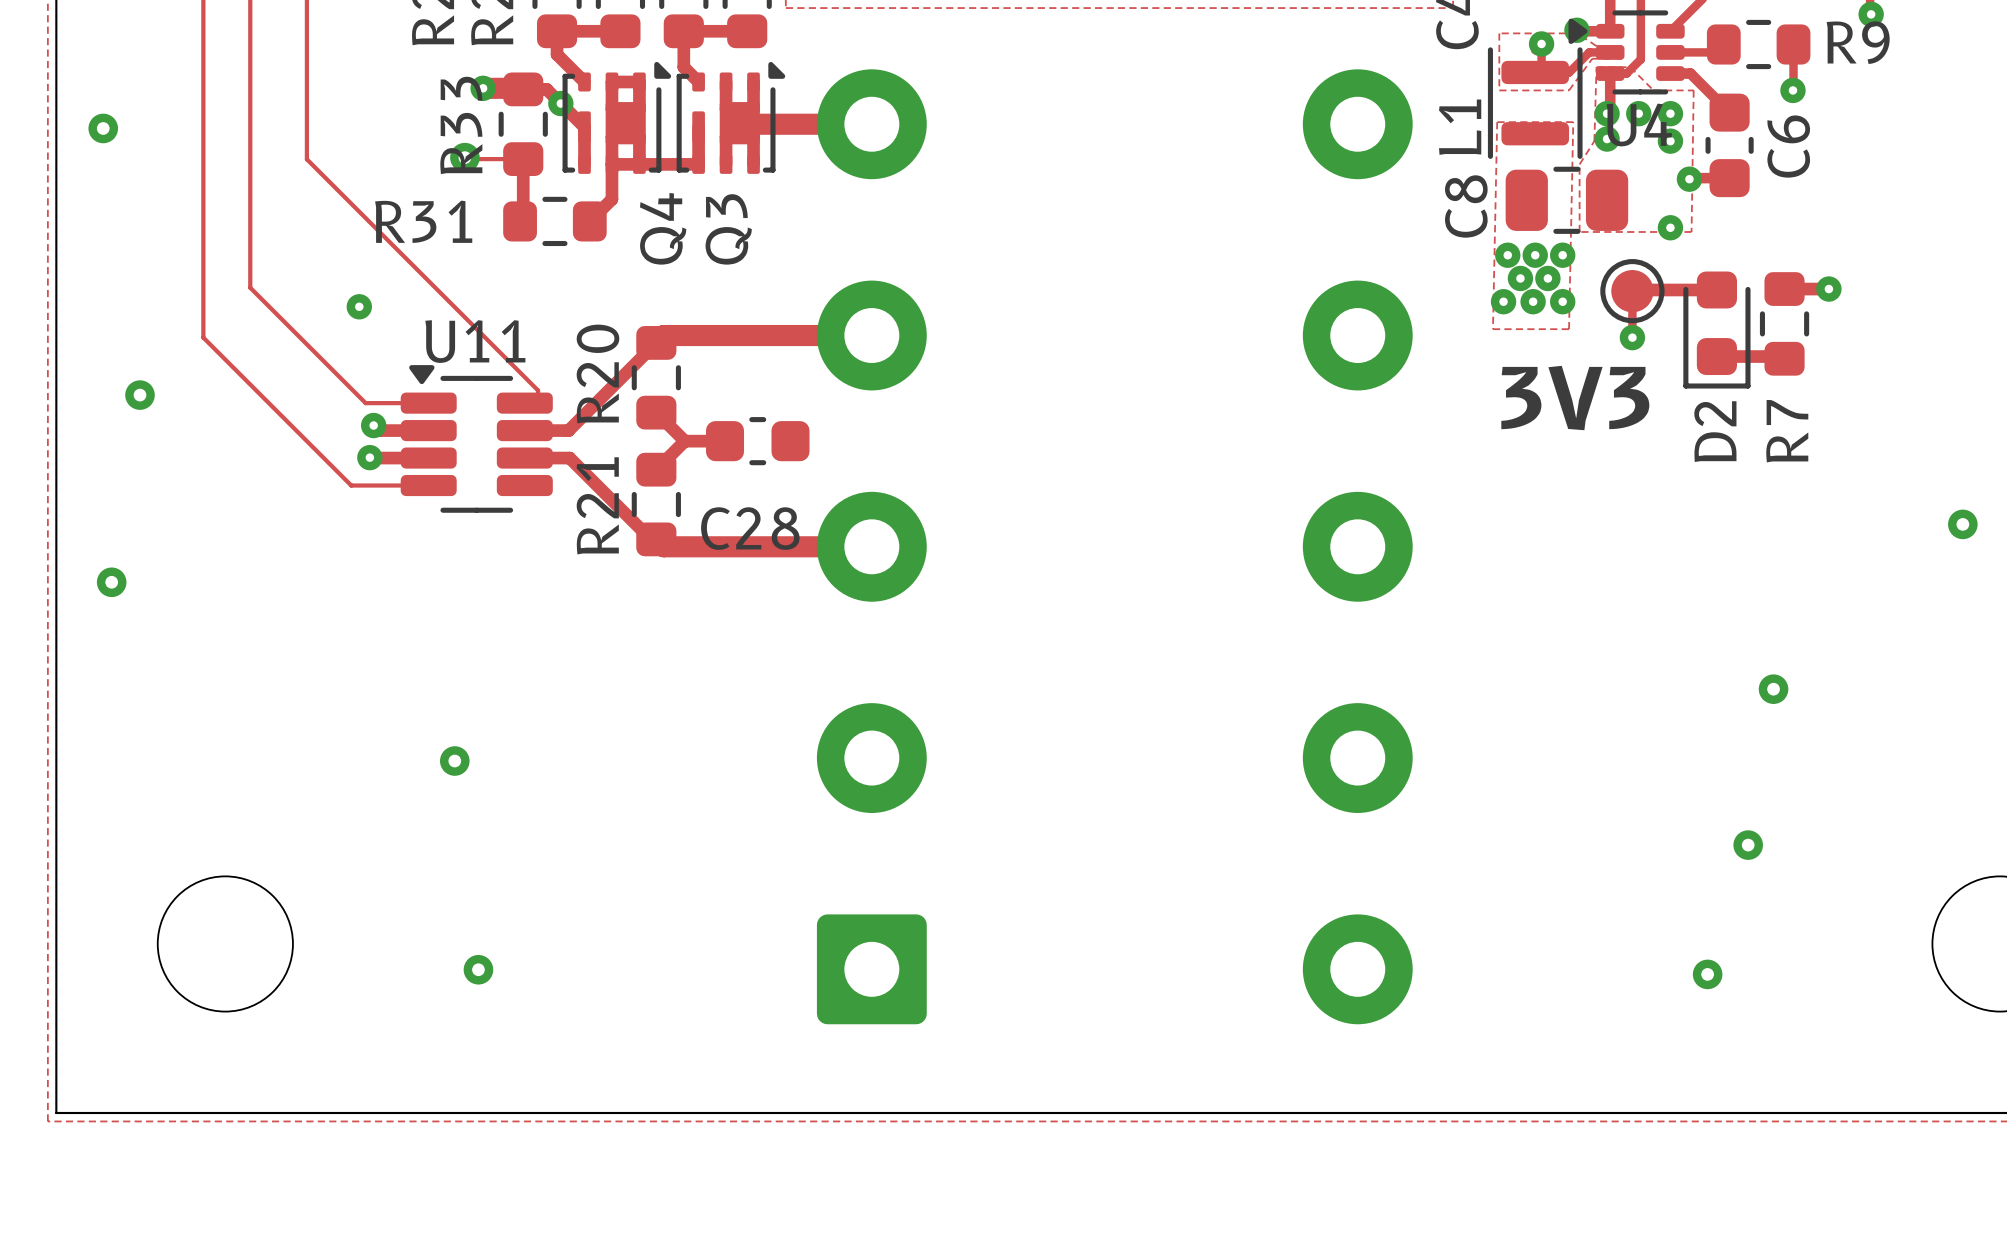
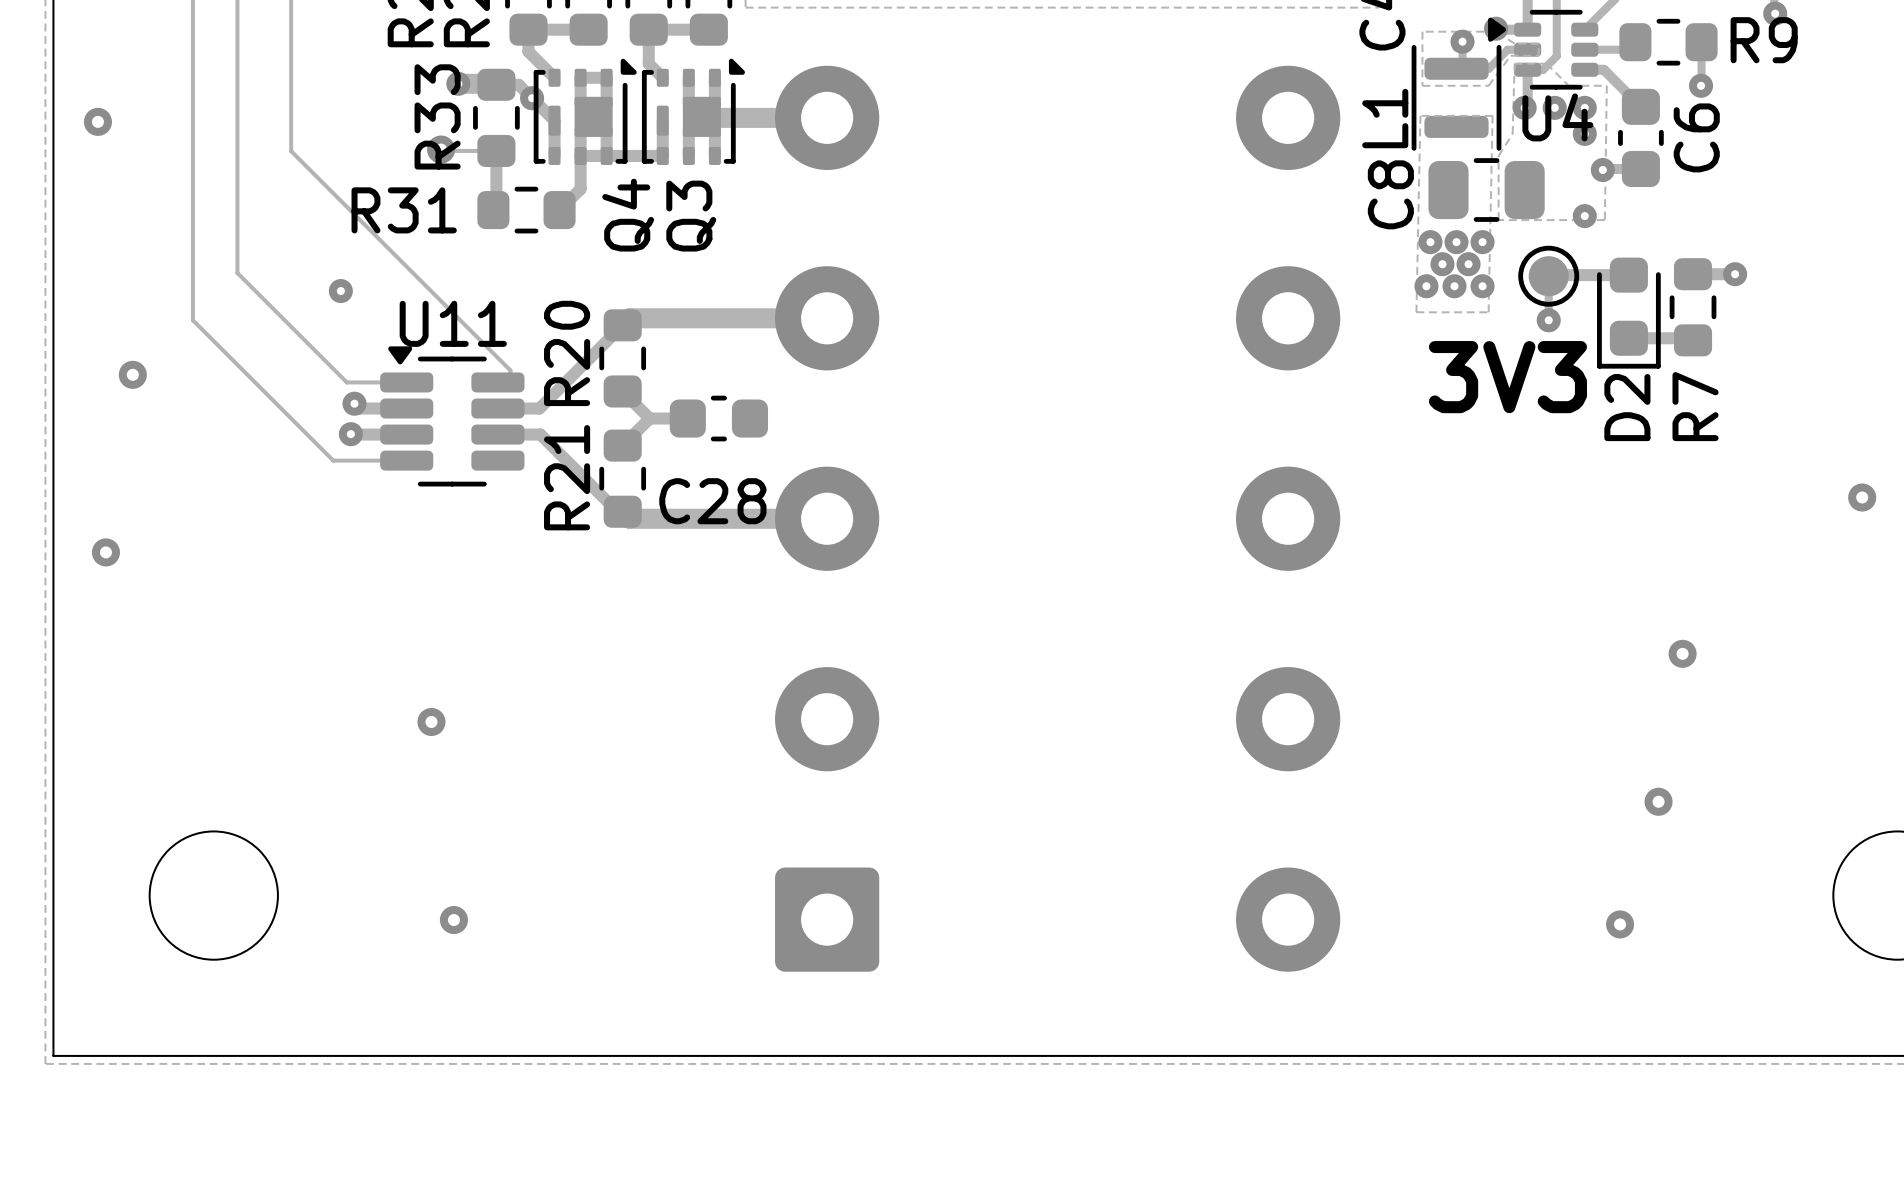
via: (1607, 139) -> none

